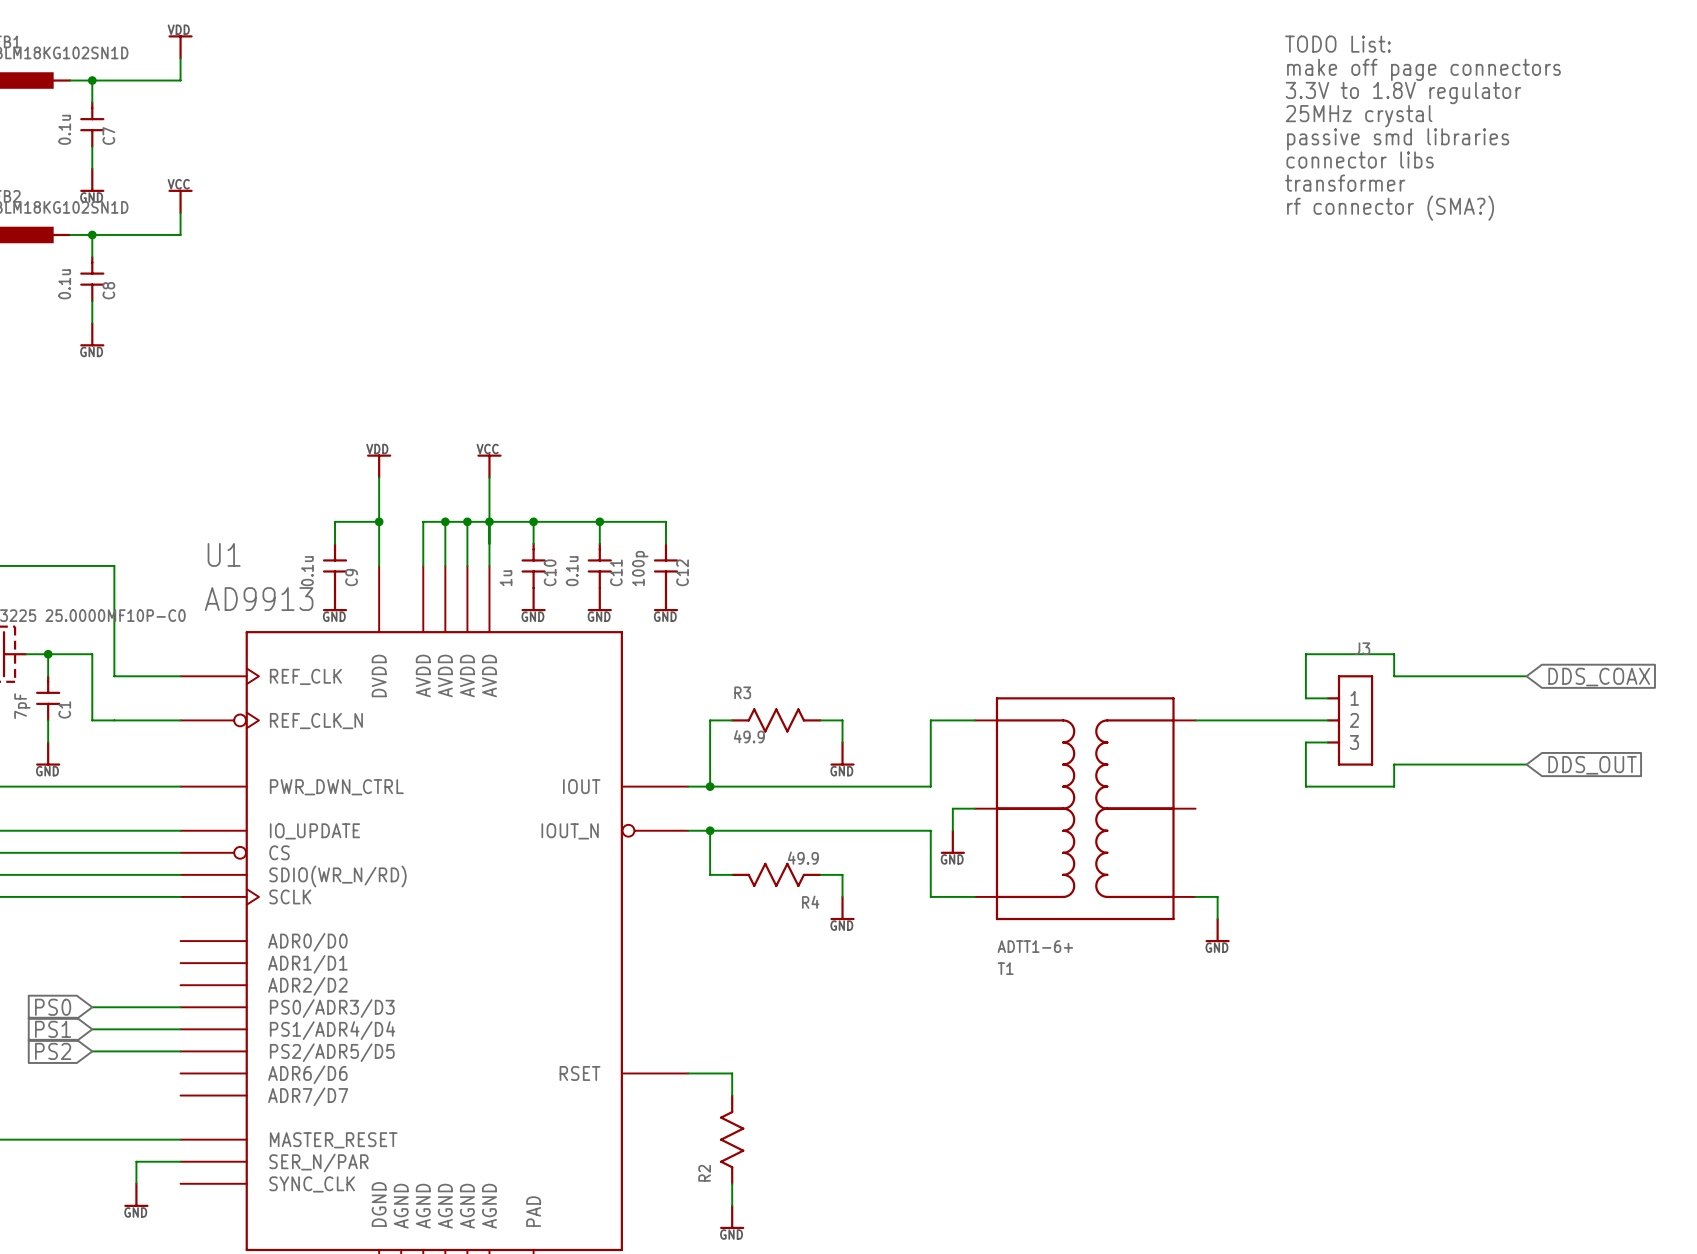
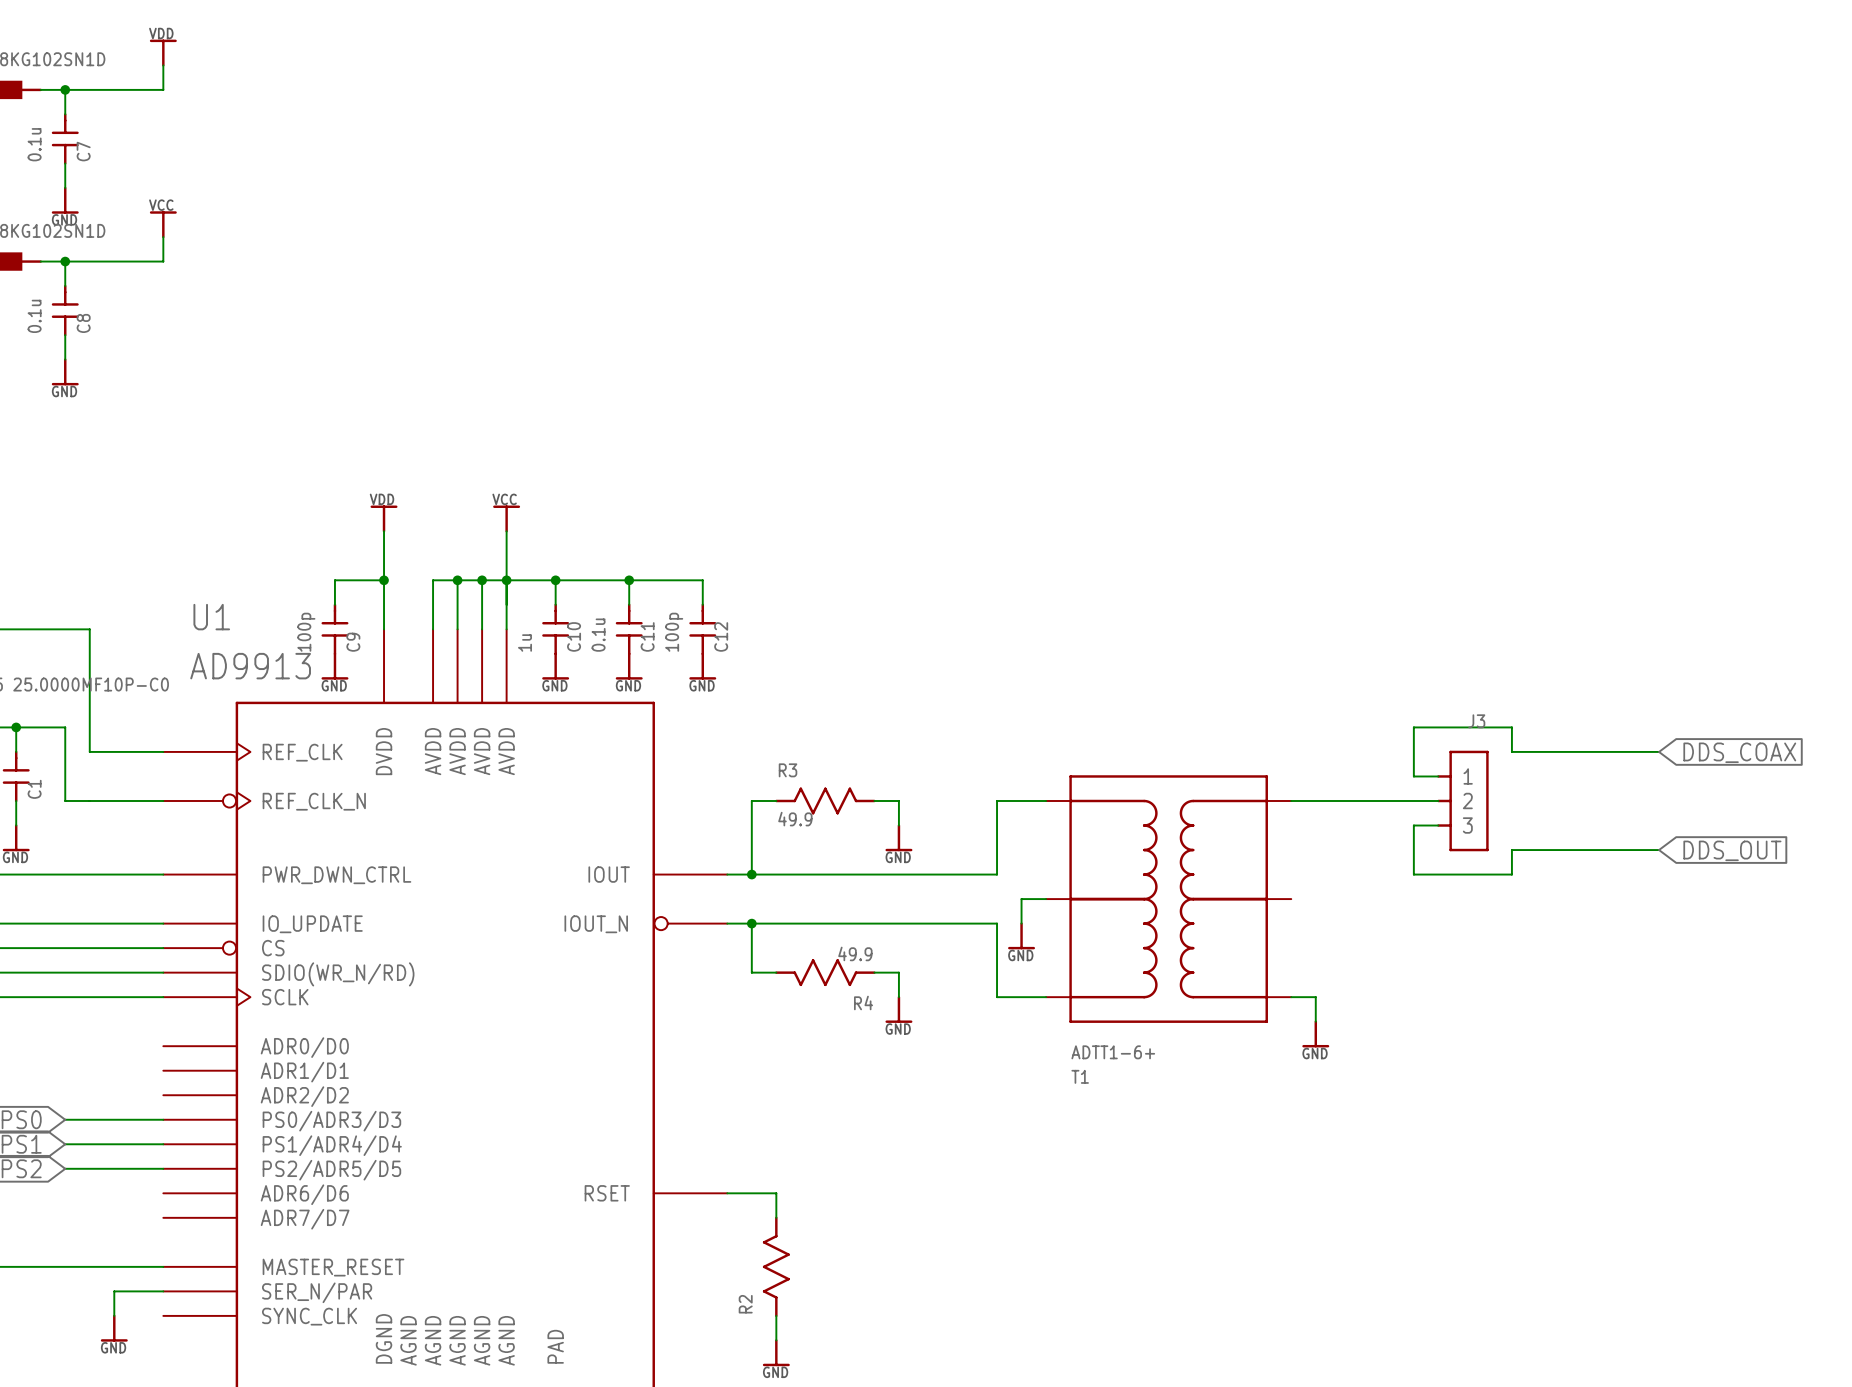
text: TODO List: (1337, 44) -> none
text: make off page connectors (1423, 69) -> none
text: 3.3V to 1.8V regulator (1403, 93) -> none
text: 25MHz crystal (1359, 116) -> none
text: passive smd libraries (1398, 139) -> none
text: connector libs (1360, 159) -> none
text: transformer (1345, 183) -> none
text: rf connector (SMA?) (1390, 208) -> none
C9 value: 0.1u (307, 571) -> 100p (306, 632)

